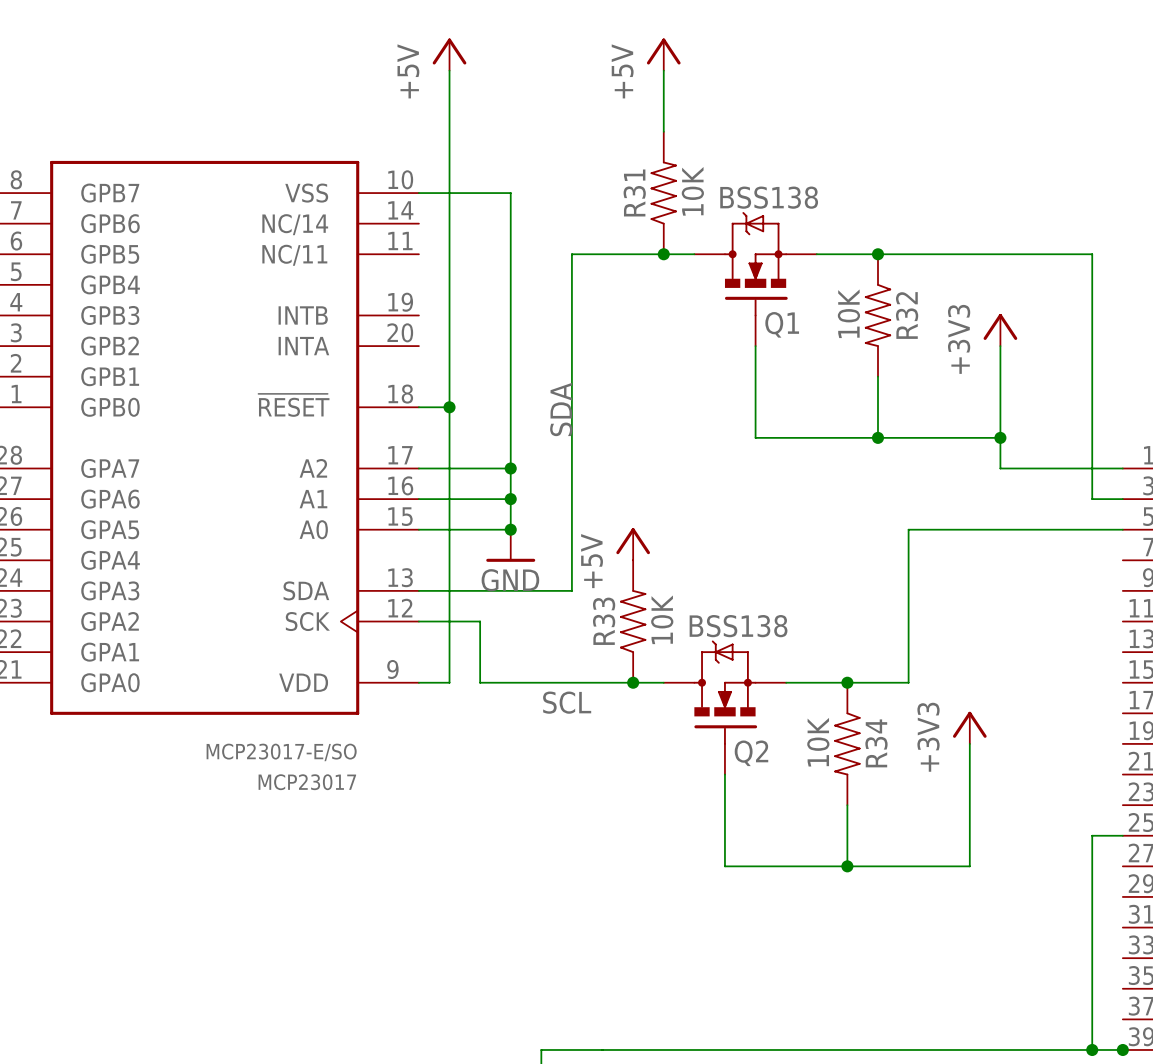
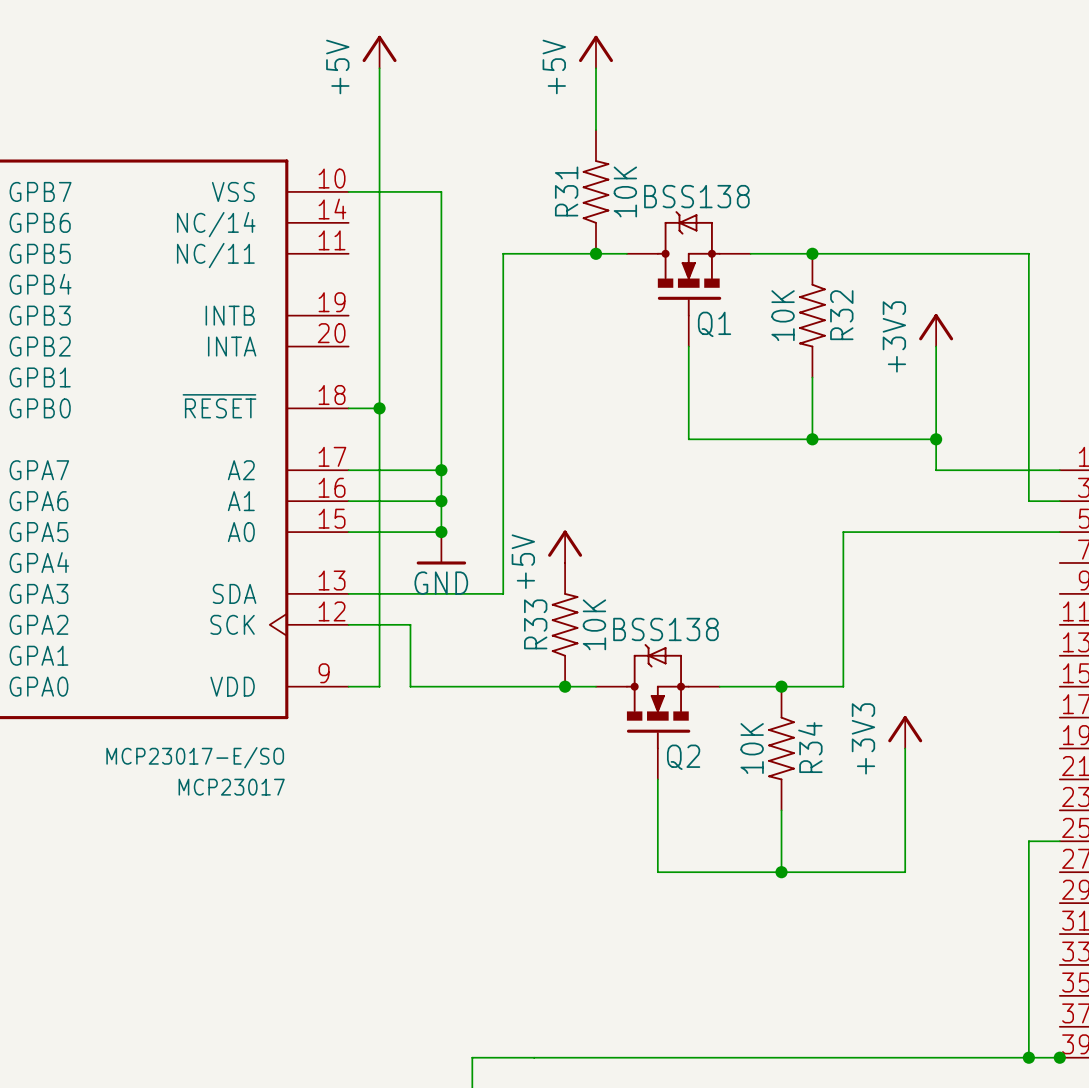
label: SDA (561, 409) -> none
label: SCL (567, 702) -> none

